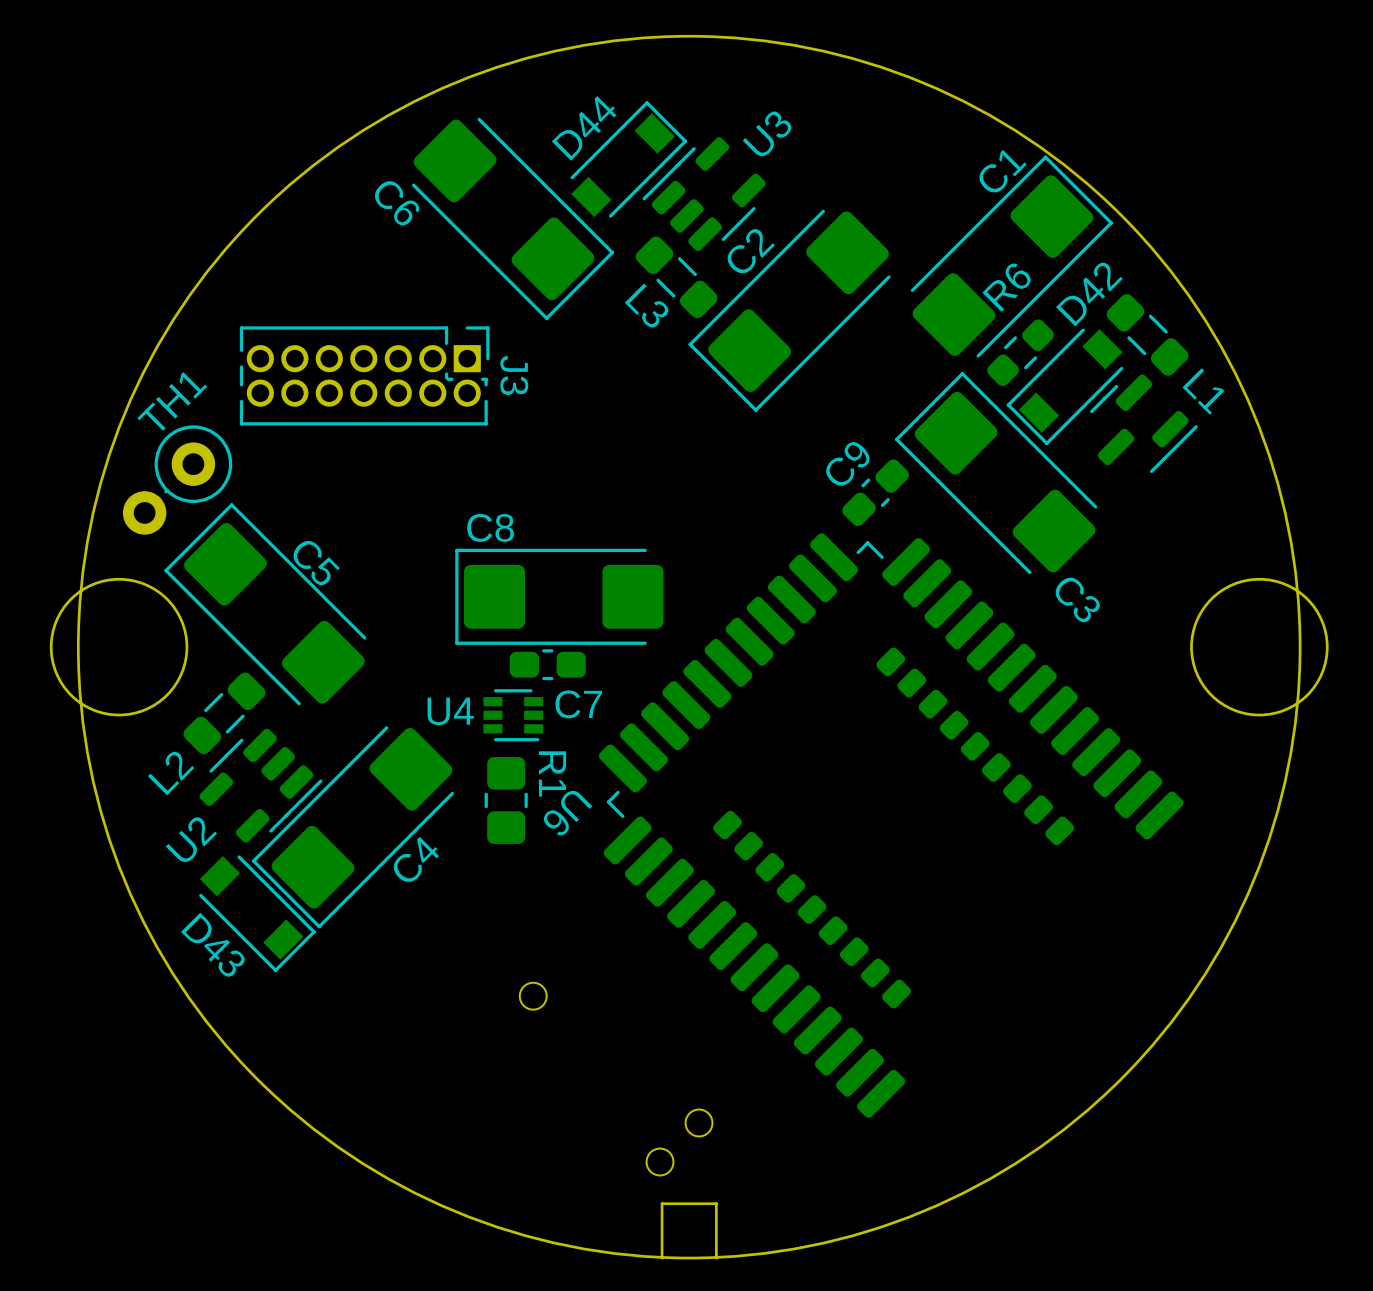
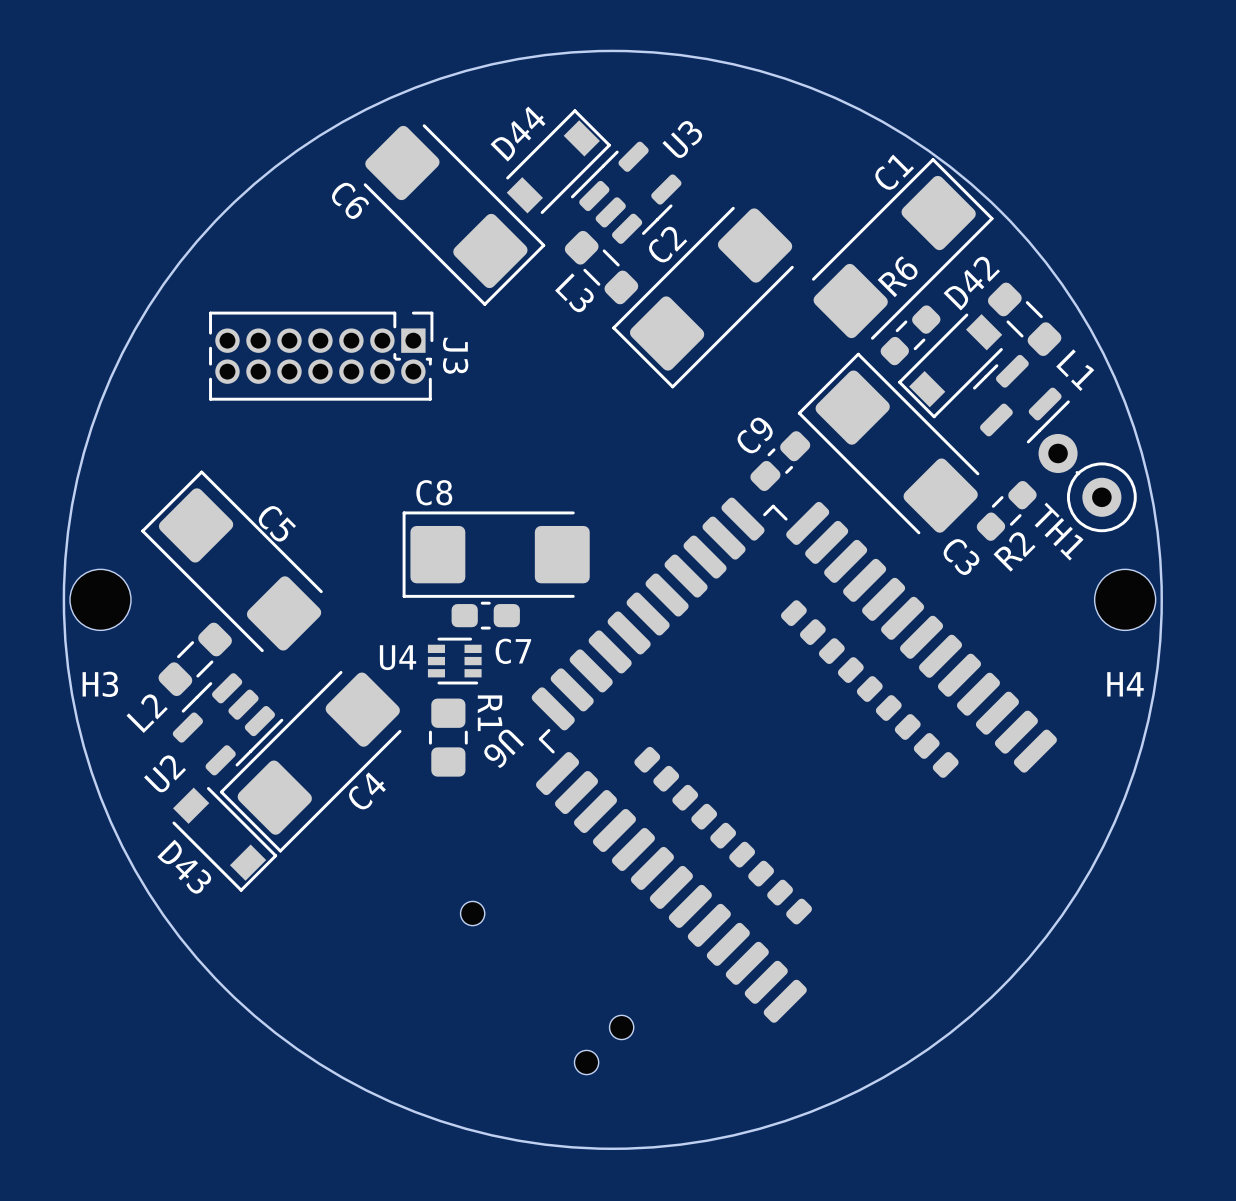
TH1 name position: TH1 (172, 401) -> TH1 (1059, 531)
TH1 rotation: 0° (177, 480) -> 90° clockwise (1087, 483)
TH1 position: (177, 480) -> (1087, 483)
R2: none -> (1006, 510)
round board edge: [49, 577, 189, 717] -> none
round board edge: [1190, 577, 1329, 717] -> none
H3: none -> (100, 599)
H4: none -> (1125, 599)
board edge: (716, 1258) (716, 1203) (662, 1203) (662, 1258) -> none

